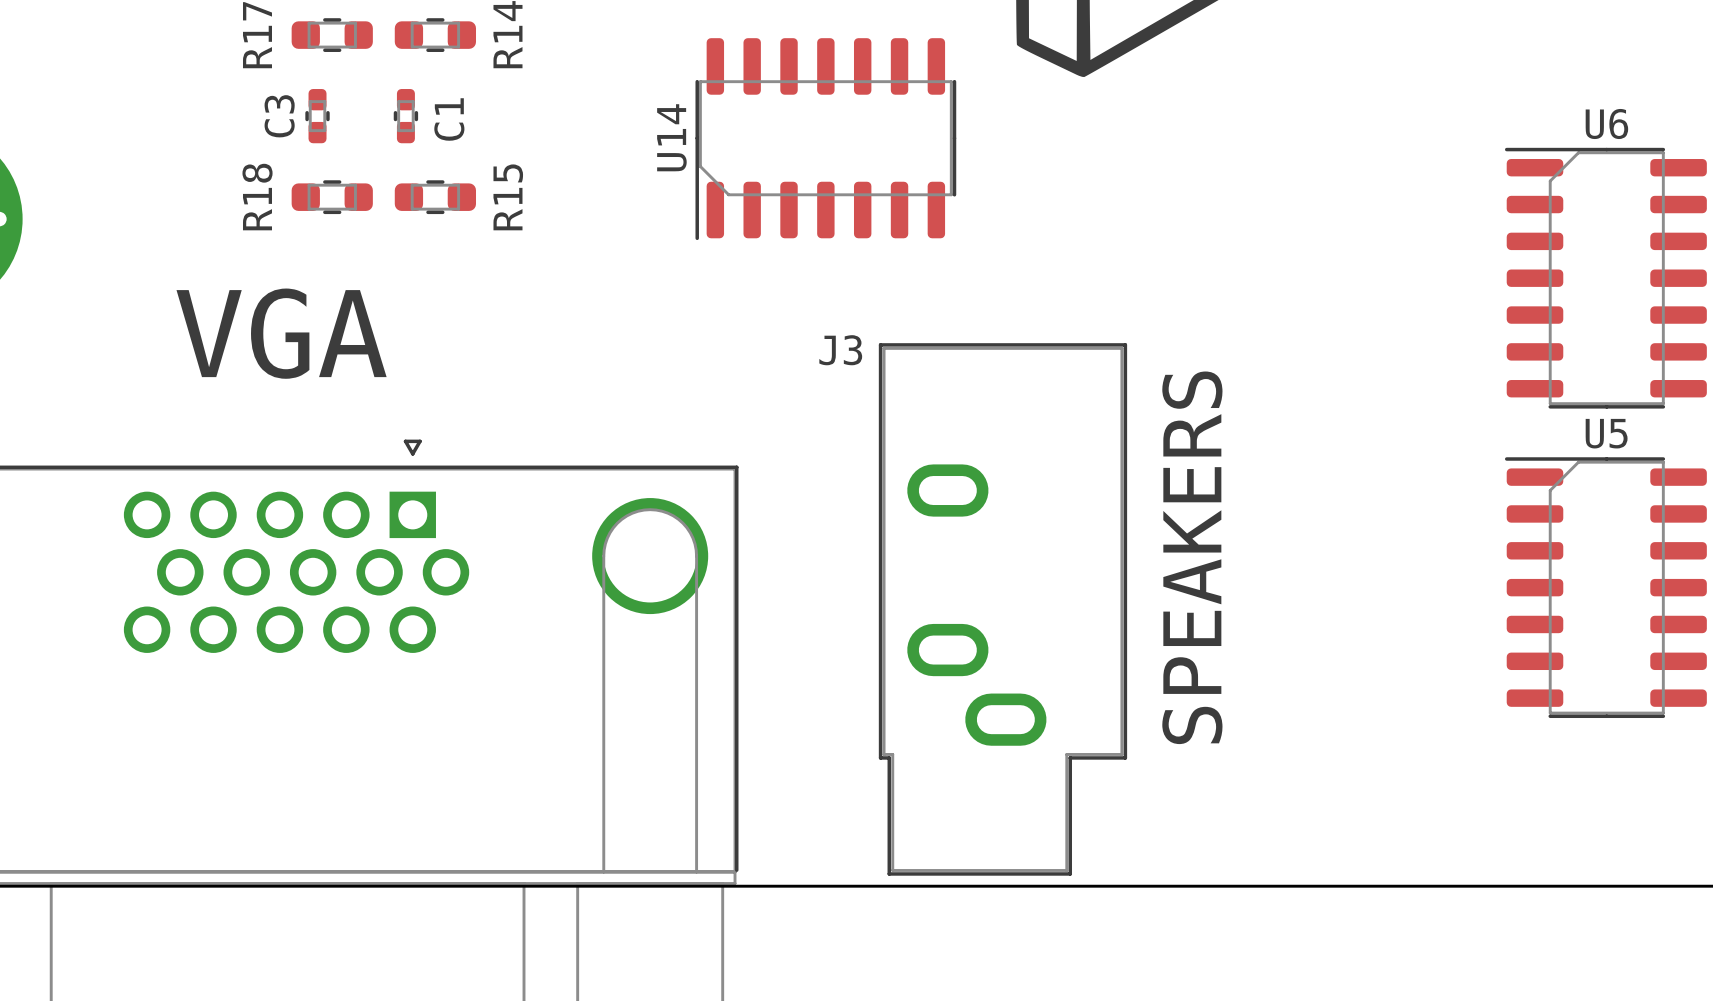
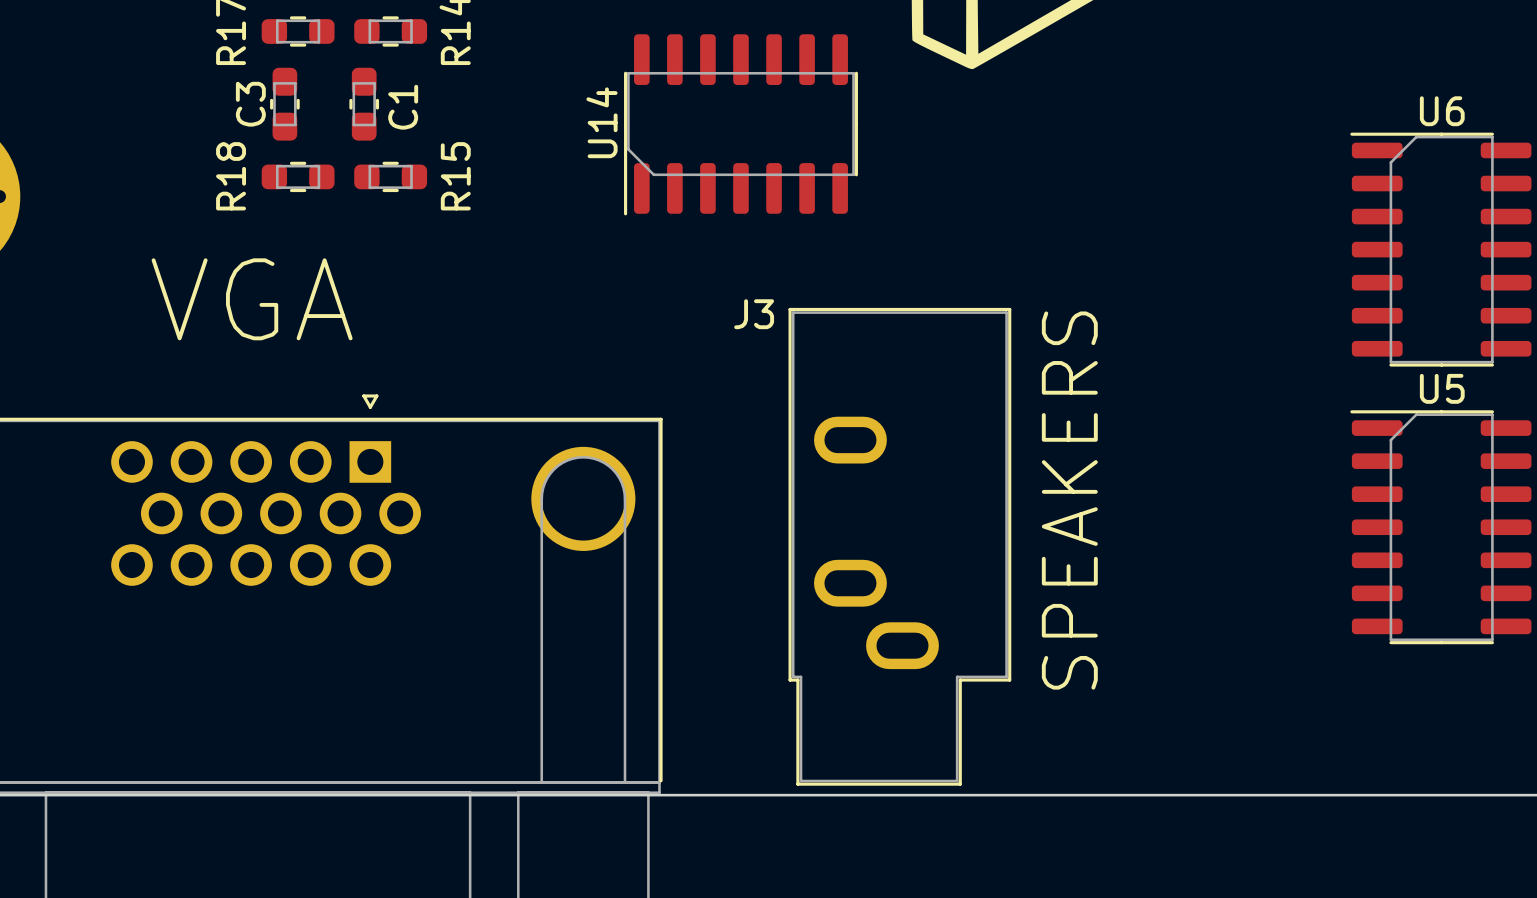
C3 footprint: [305, 89, 330, 144] -> [270, 67, 300, 141]
C1 footprint: [393, 89, 419, 144] -> [349, 67, 380, 141]

